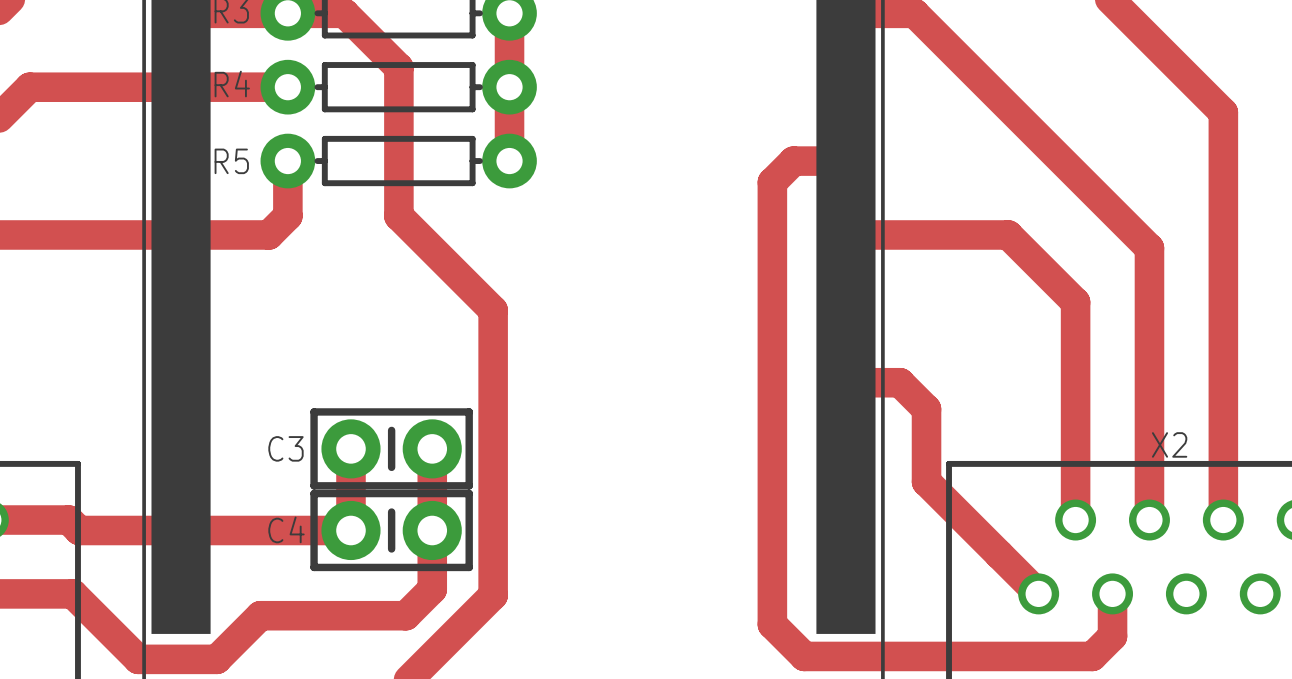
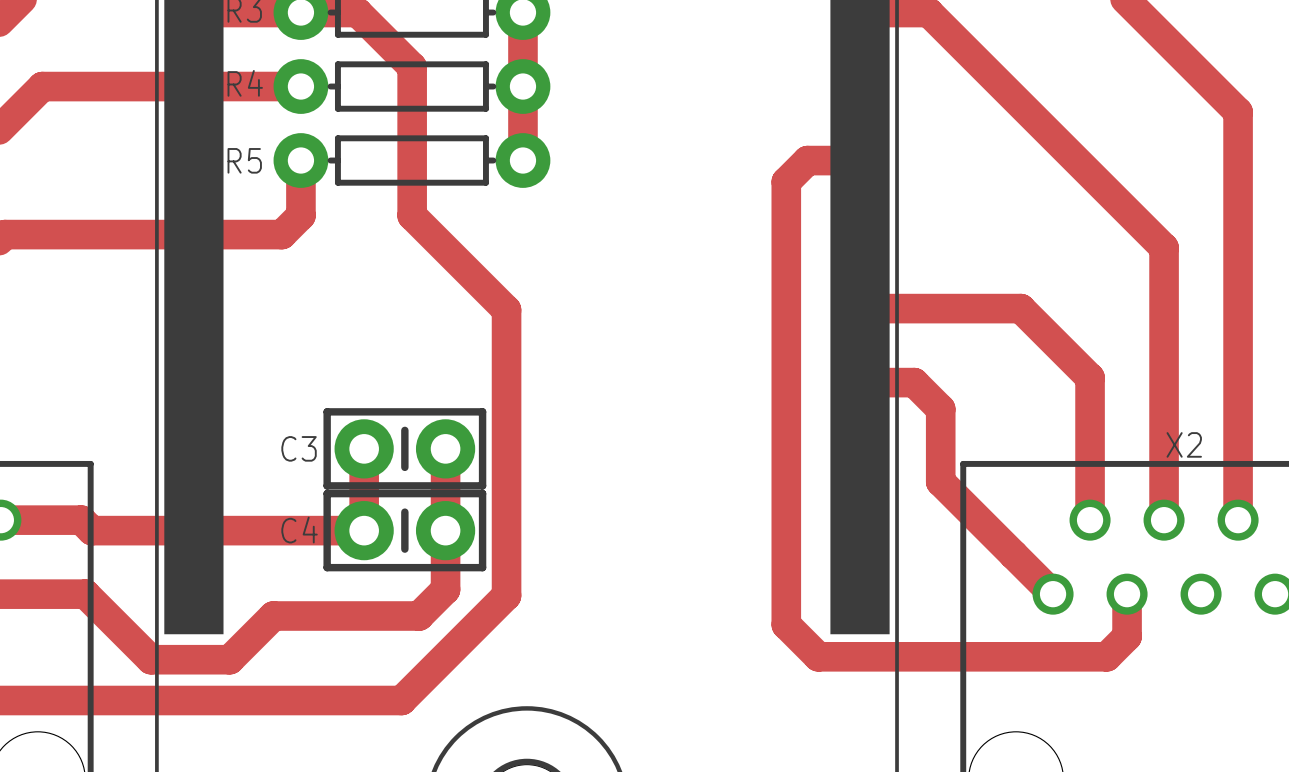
track: (845, 234) (1008, 234) (1075, 302) (1075, 377) -> (860, 308) (1020, 308) (1090, 377)

